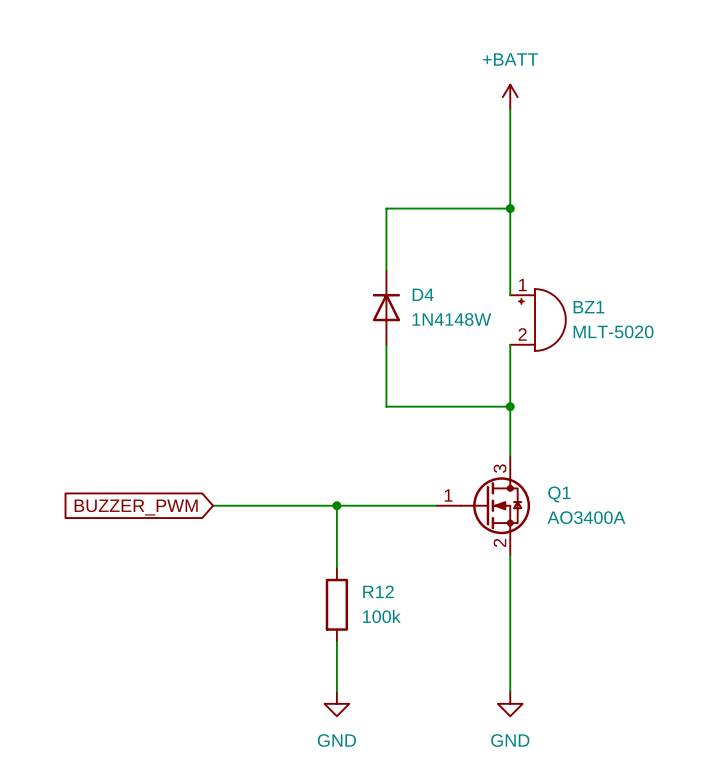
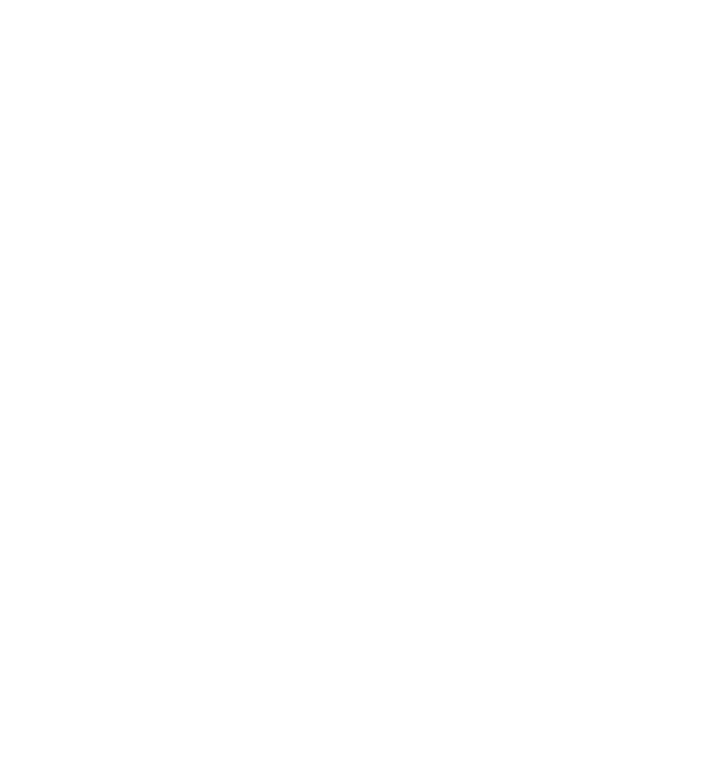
power symbol: +BATT (510, 97) -> none
wire: (510, 109) (510, 295) -> none
wire: (510, 208) (386, 208) (386, 270) -> none
junction: (510, 208) -> none
D4: 1N4148W (386, 307) -> none
BZ1: MLT-5020 (538, 320) -> none
wire: (386, 344) (386, 406) (510, 406) -> none
wire: (510, 344) (510, 456) -> none
junction: (510, 406) -> none
wire: (213, 505) (435, 505) -> none
wire: (336, 505) (336, 567) -> none
junction: (336, 505) -> none
Q1: AO3400A (483, 505) -> none
global label: BUZZER_PWM (136, 507) -> none
wire: (510, 555) (510, 691) -> none
R12: 100k (336, 604) -> none
wire: (336, 641) (336, 691) -> none
power symbol: GND (336, 703) -> none
power symbol: GND (510, 703) -> none

